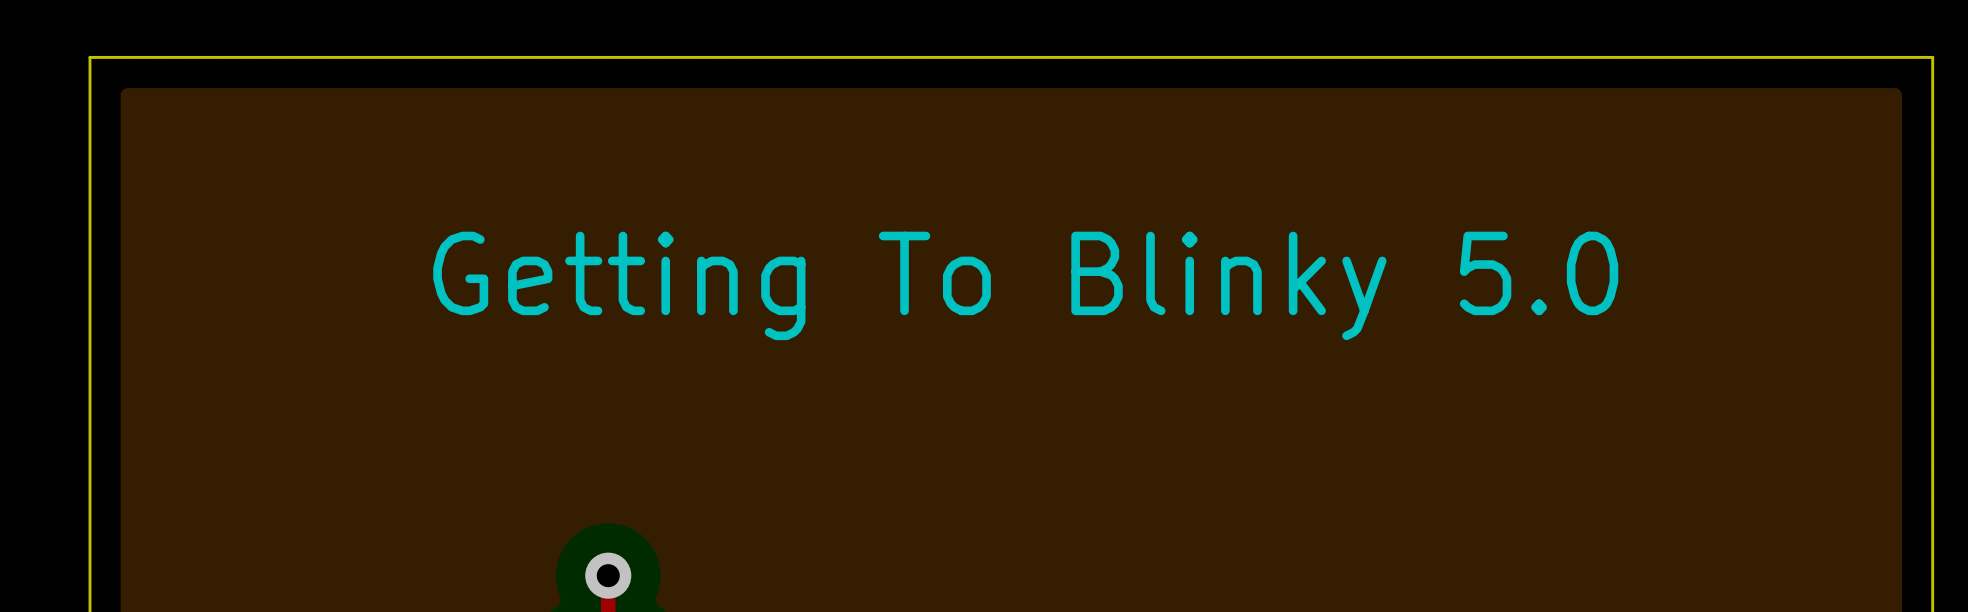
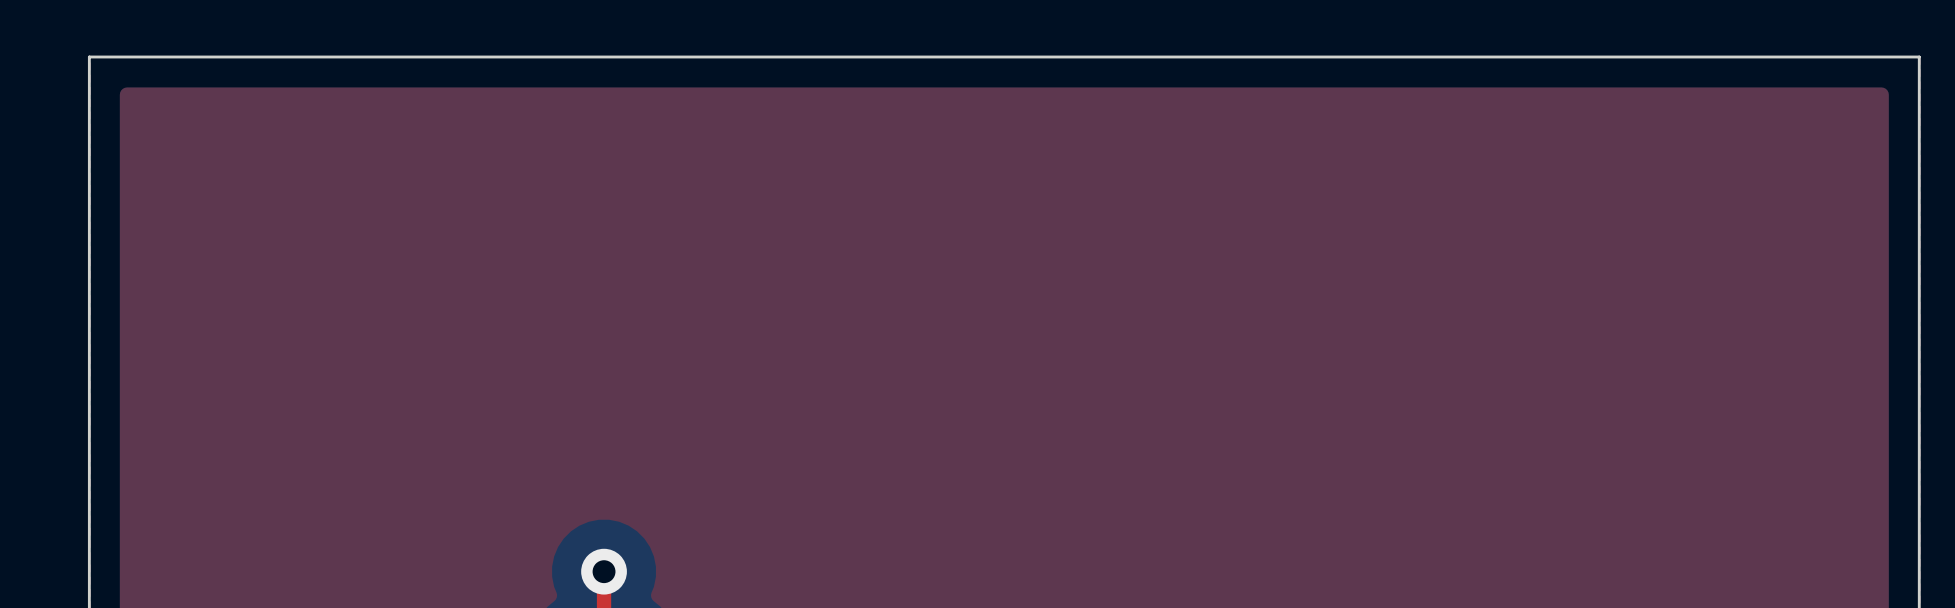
text: Getting To Blinky 5.0 (1025, 285) -> none

